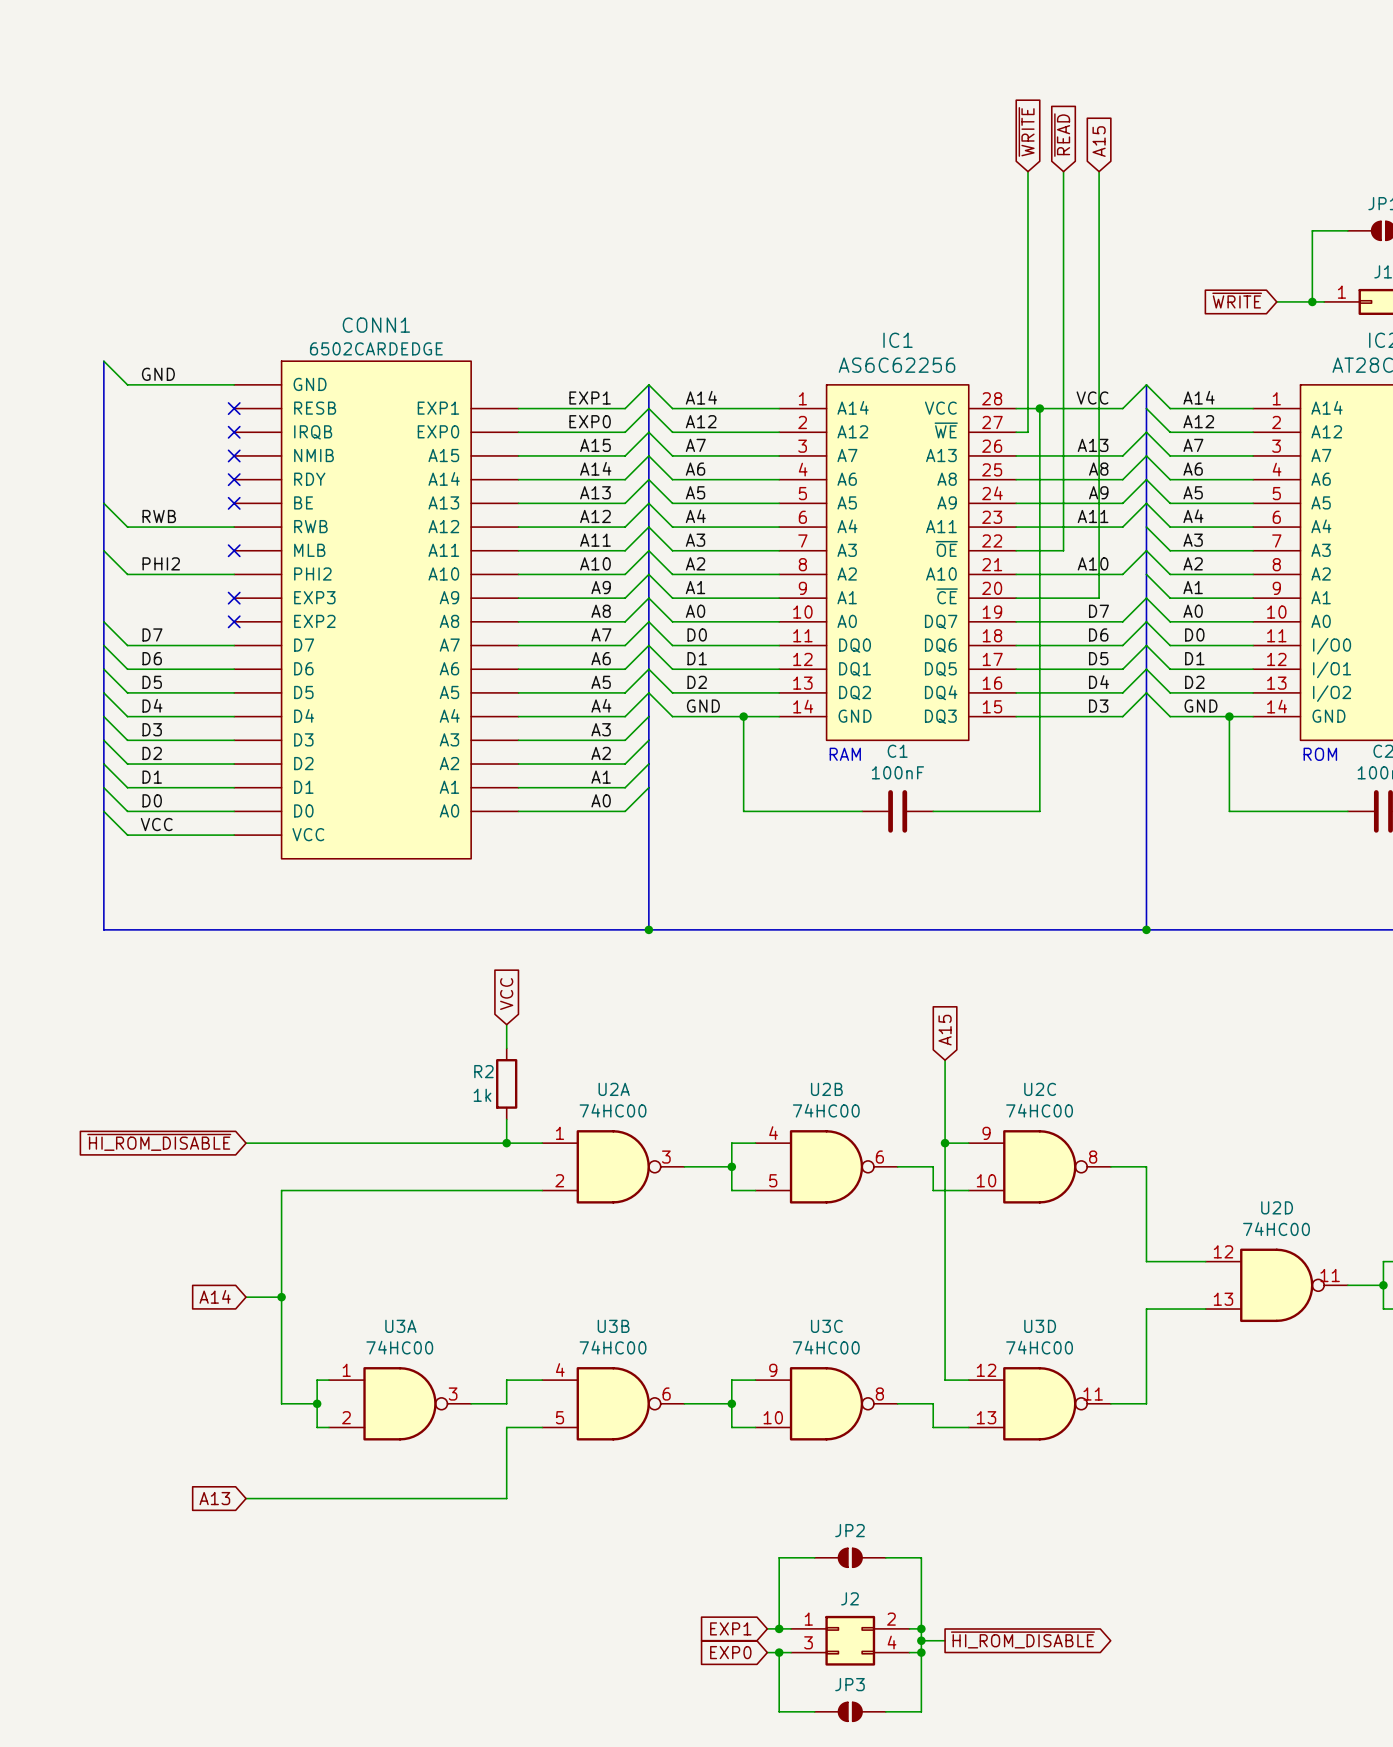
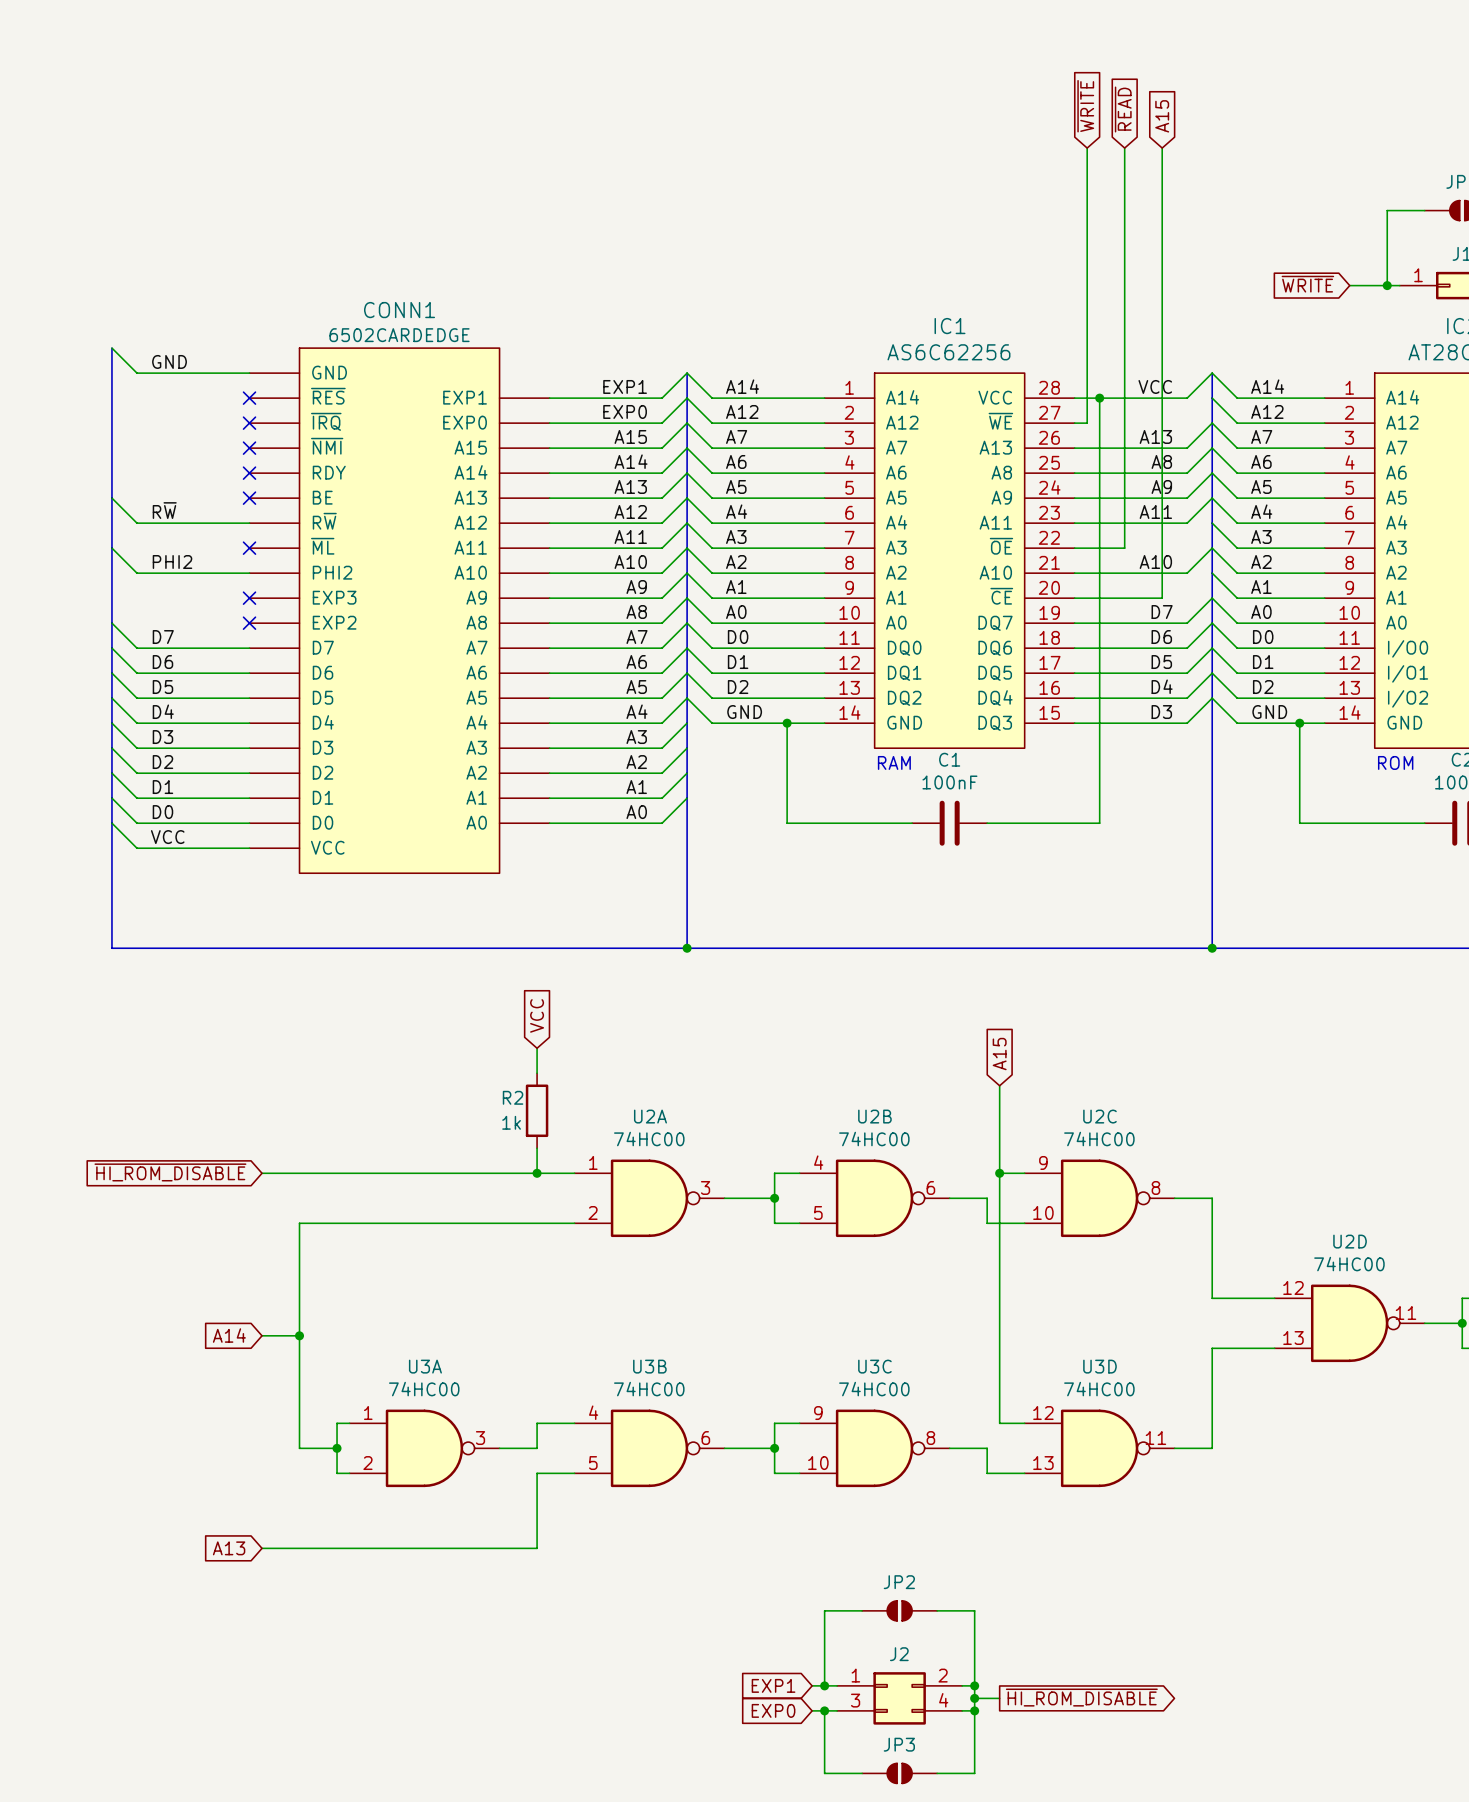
CONN1 pin name: RESB (315, 408) -> ~{RES} (328, 396)
CONN1 pin name: IRQB (313, 432) -> ~{IRQ} (326, 421)
CONN1 pin name: NMIB (314, 455) -> ~{NMI} (327, 446)
label: RWB (159, 516) -> R~{W} (164, 510)
CONN1 pin name: RWB (310, 526) -> R~{W} (324, 521)
CONN1 pin name: MLB (309, 550) -> ~{ML} (322, 546)

